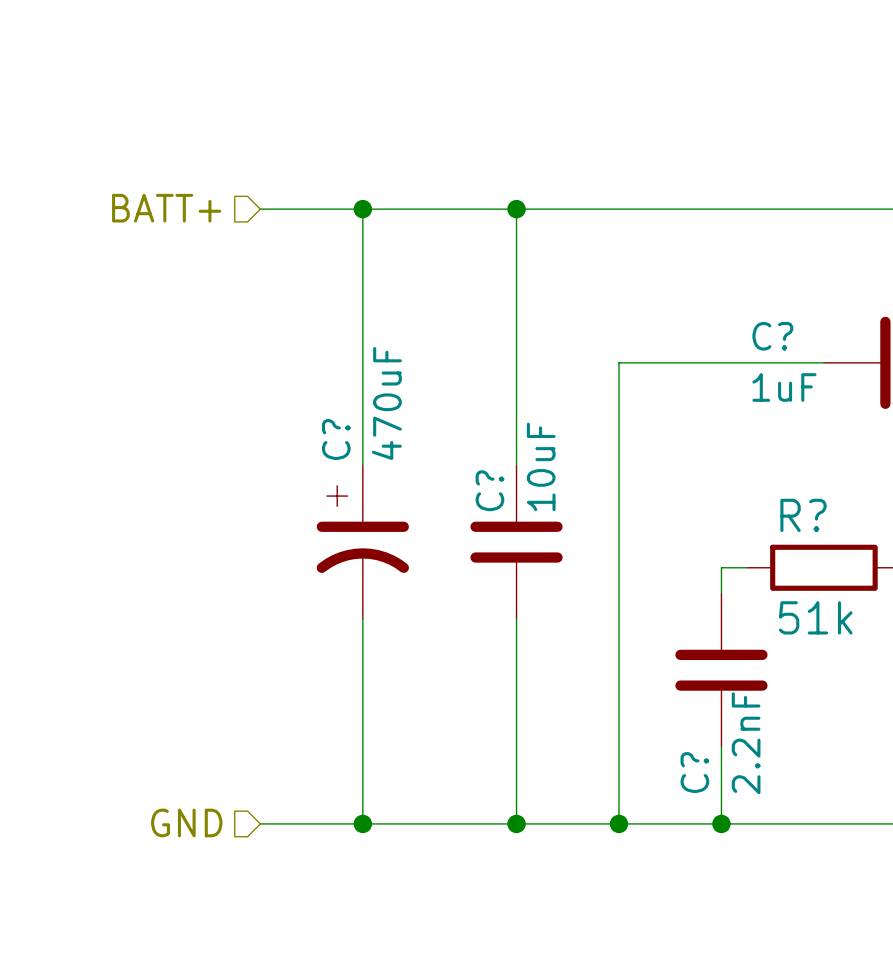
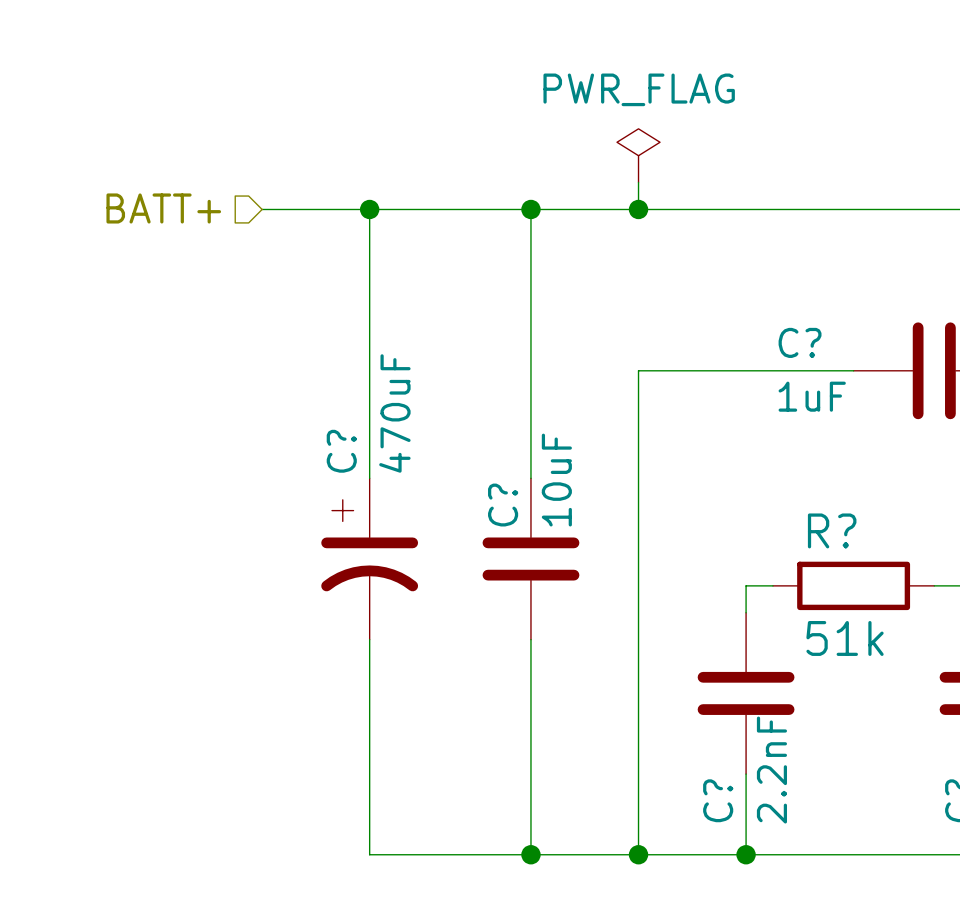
power symbol: none -> PWR_FLAG (638, 155)
wire: none -> (638, 182) (638, 209)
junction: none -> (638, 209)
hierarchical label: GND (186, 822) -> none
wire: (260, 823) (362, 823) -> none
junction: (362, 823) -> none

